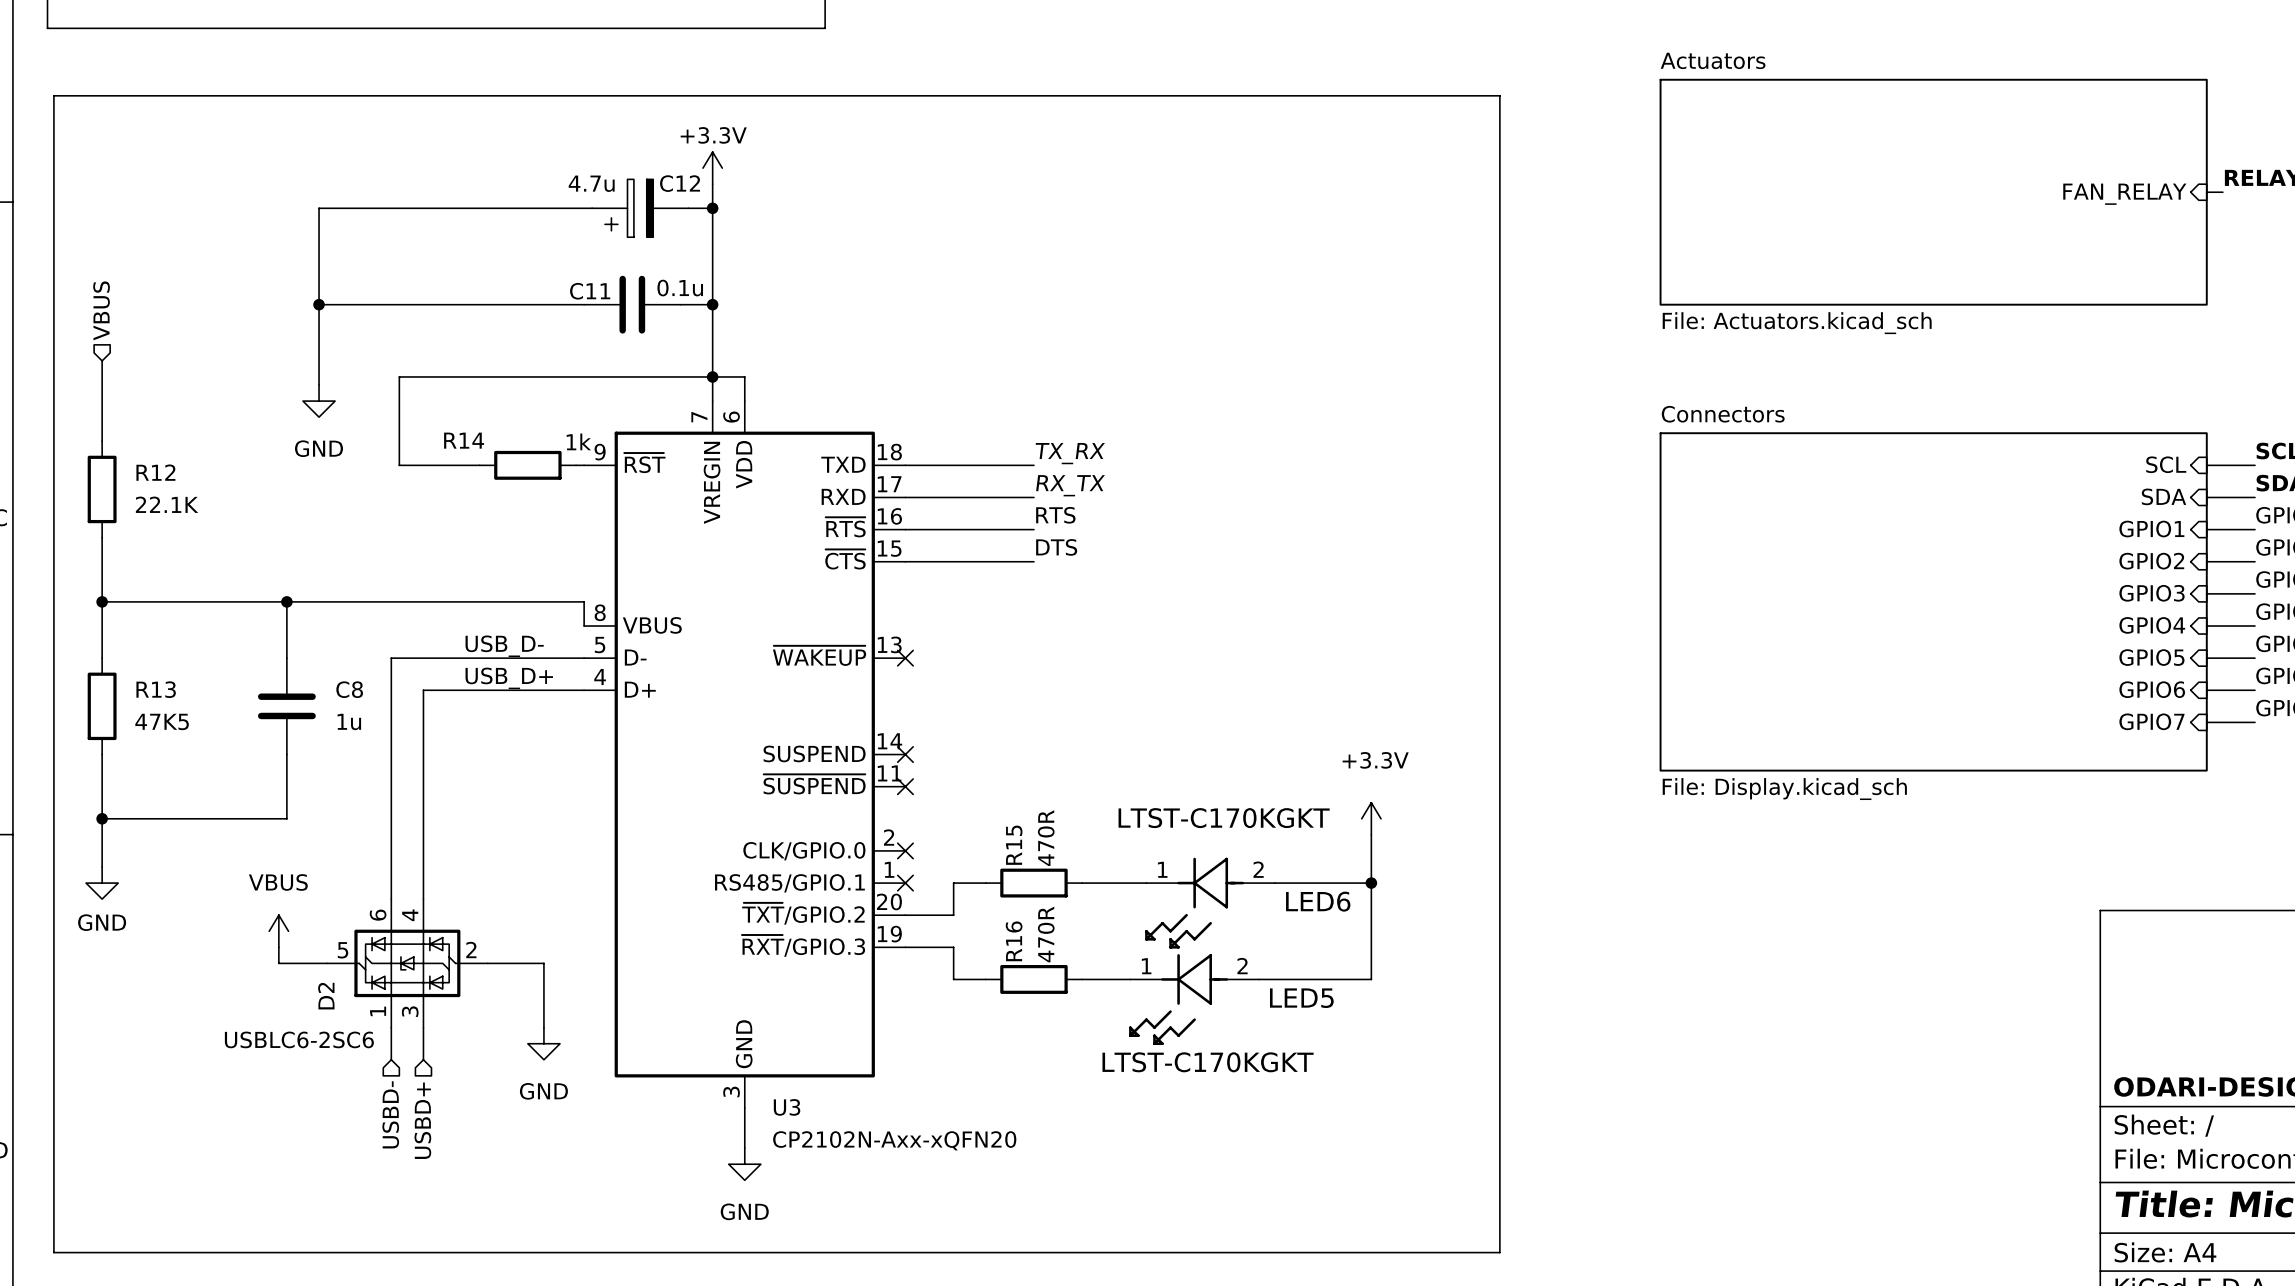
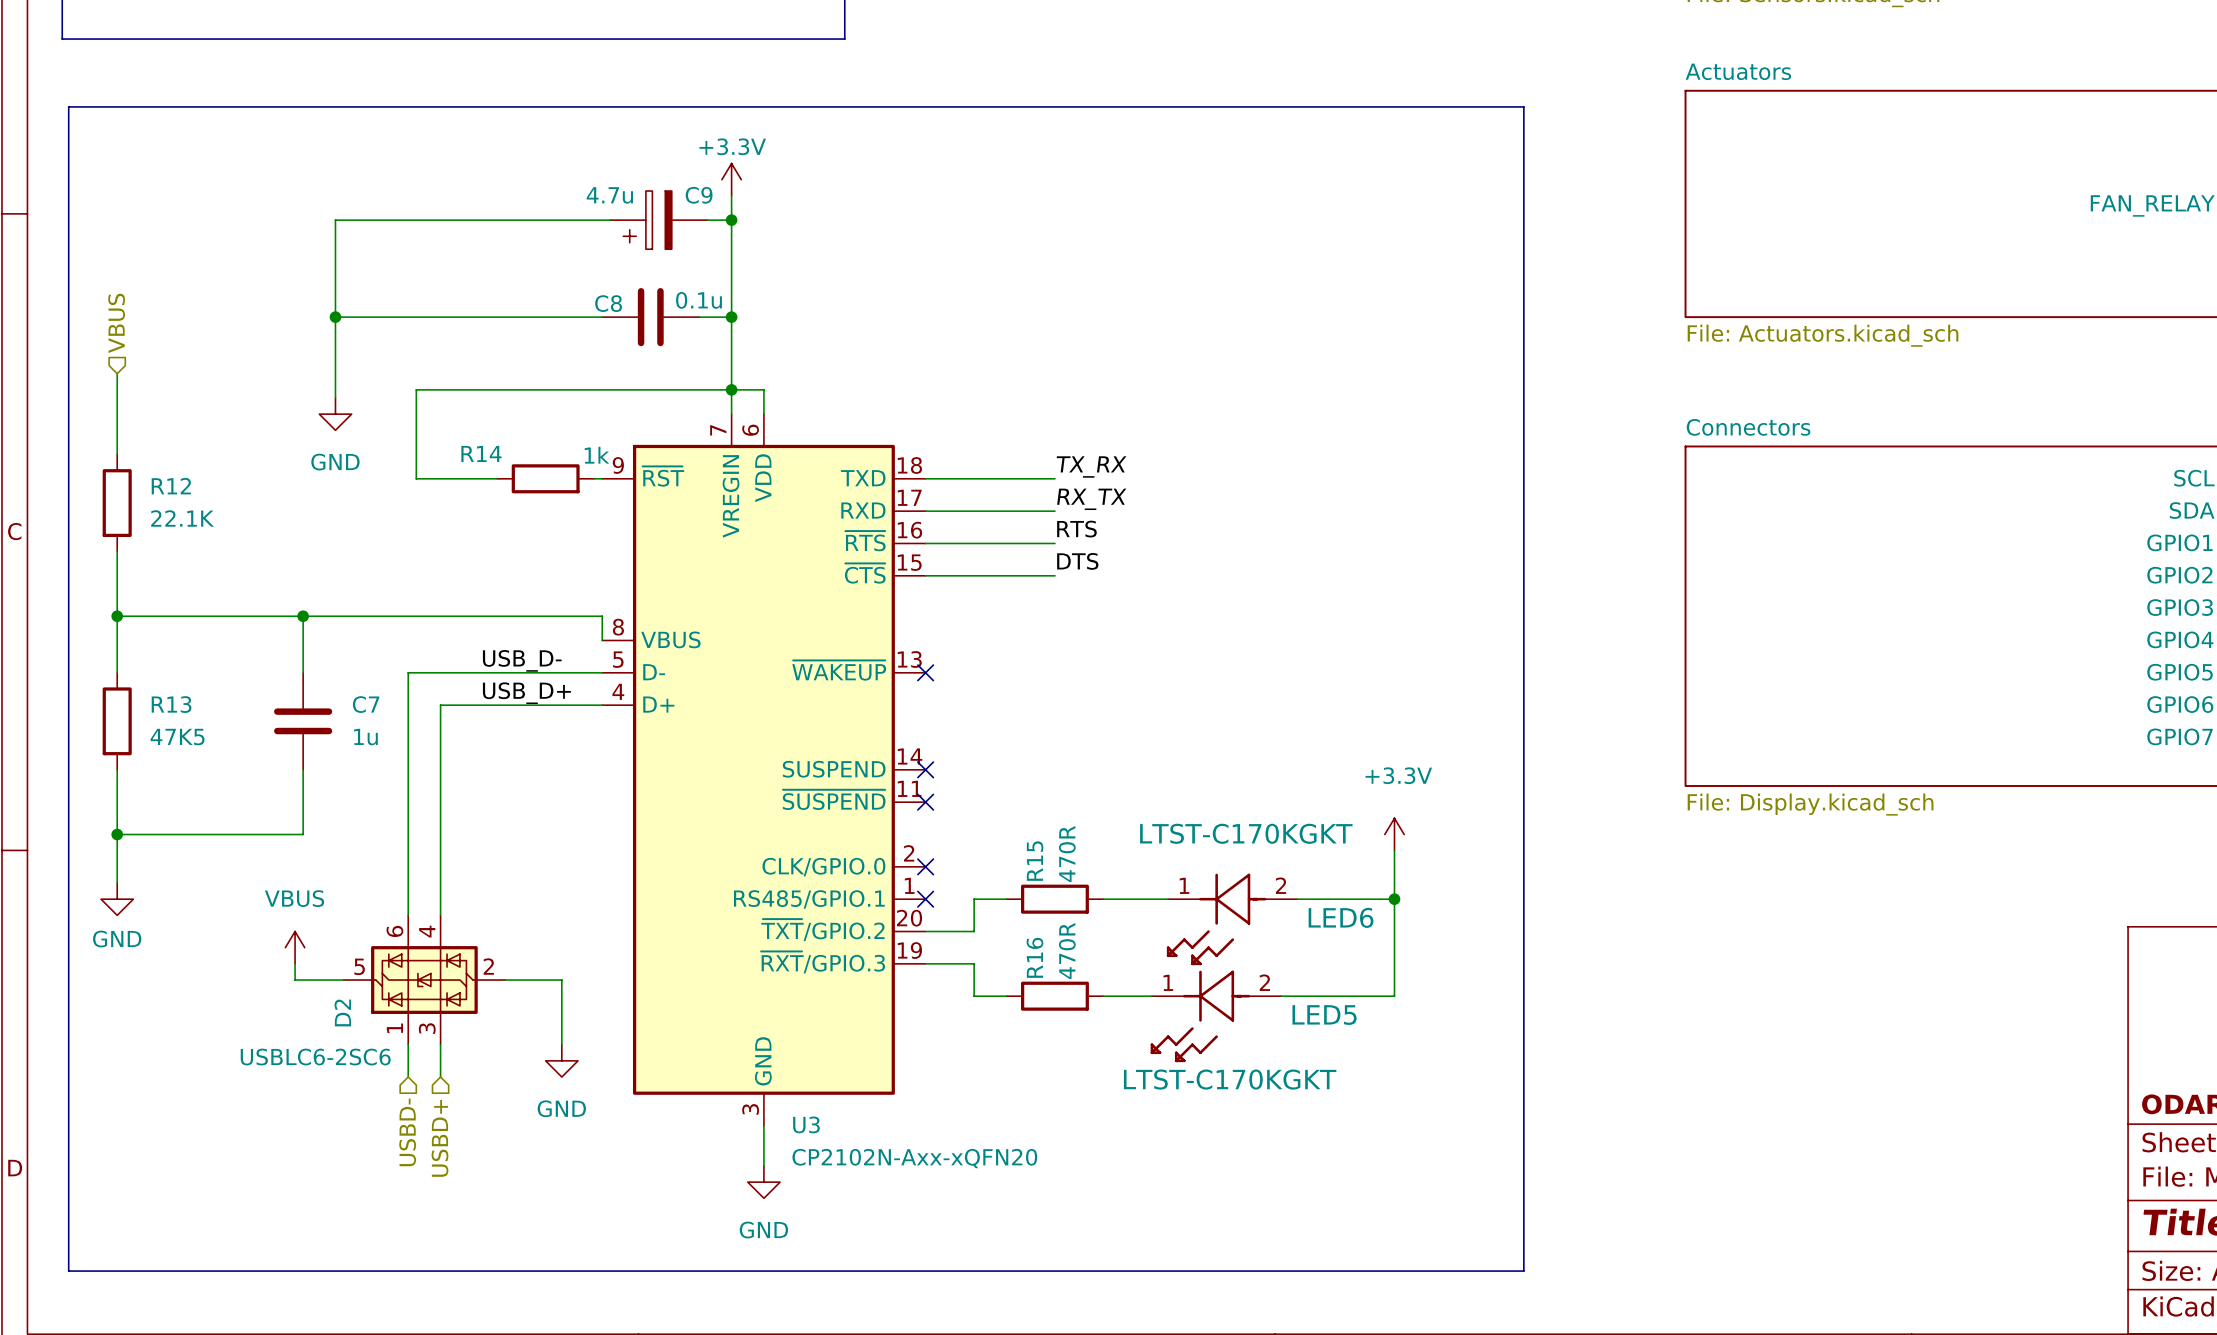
C12 name: C12 (680, 183) -> C9 (699, 195)
C11 name: C11 (590, 291) -> C8 (608, 303)
C8 name: C8 (349, 689) -> C7 (366, 704)

